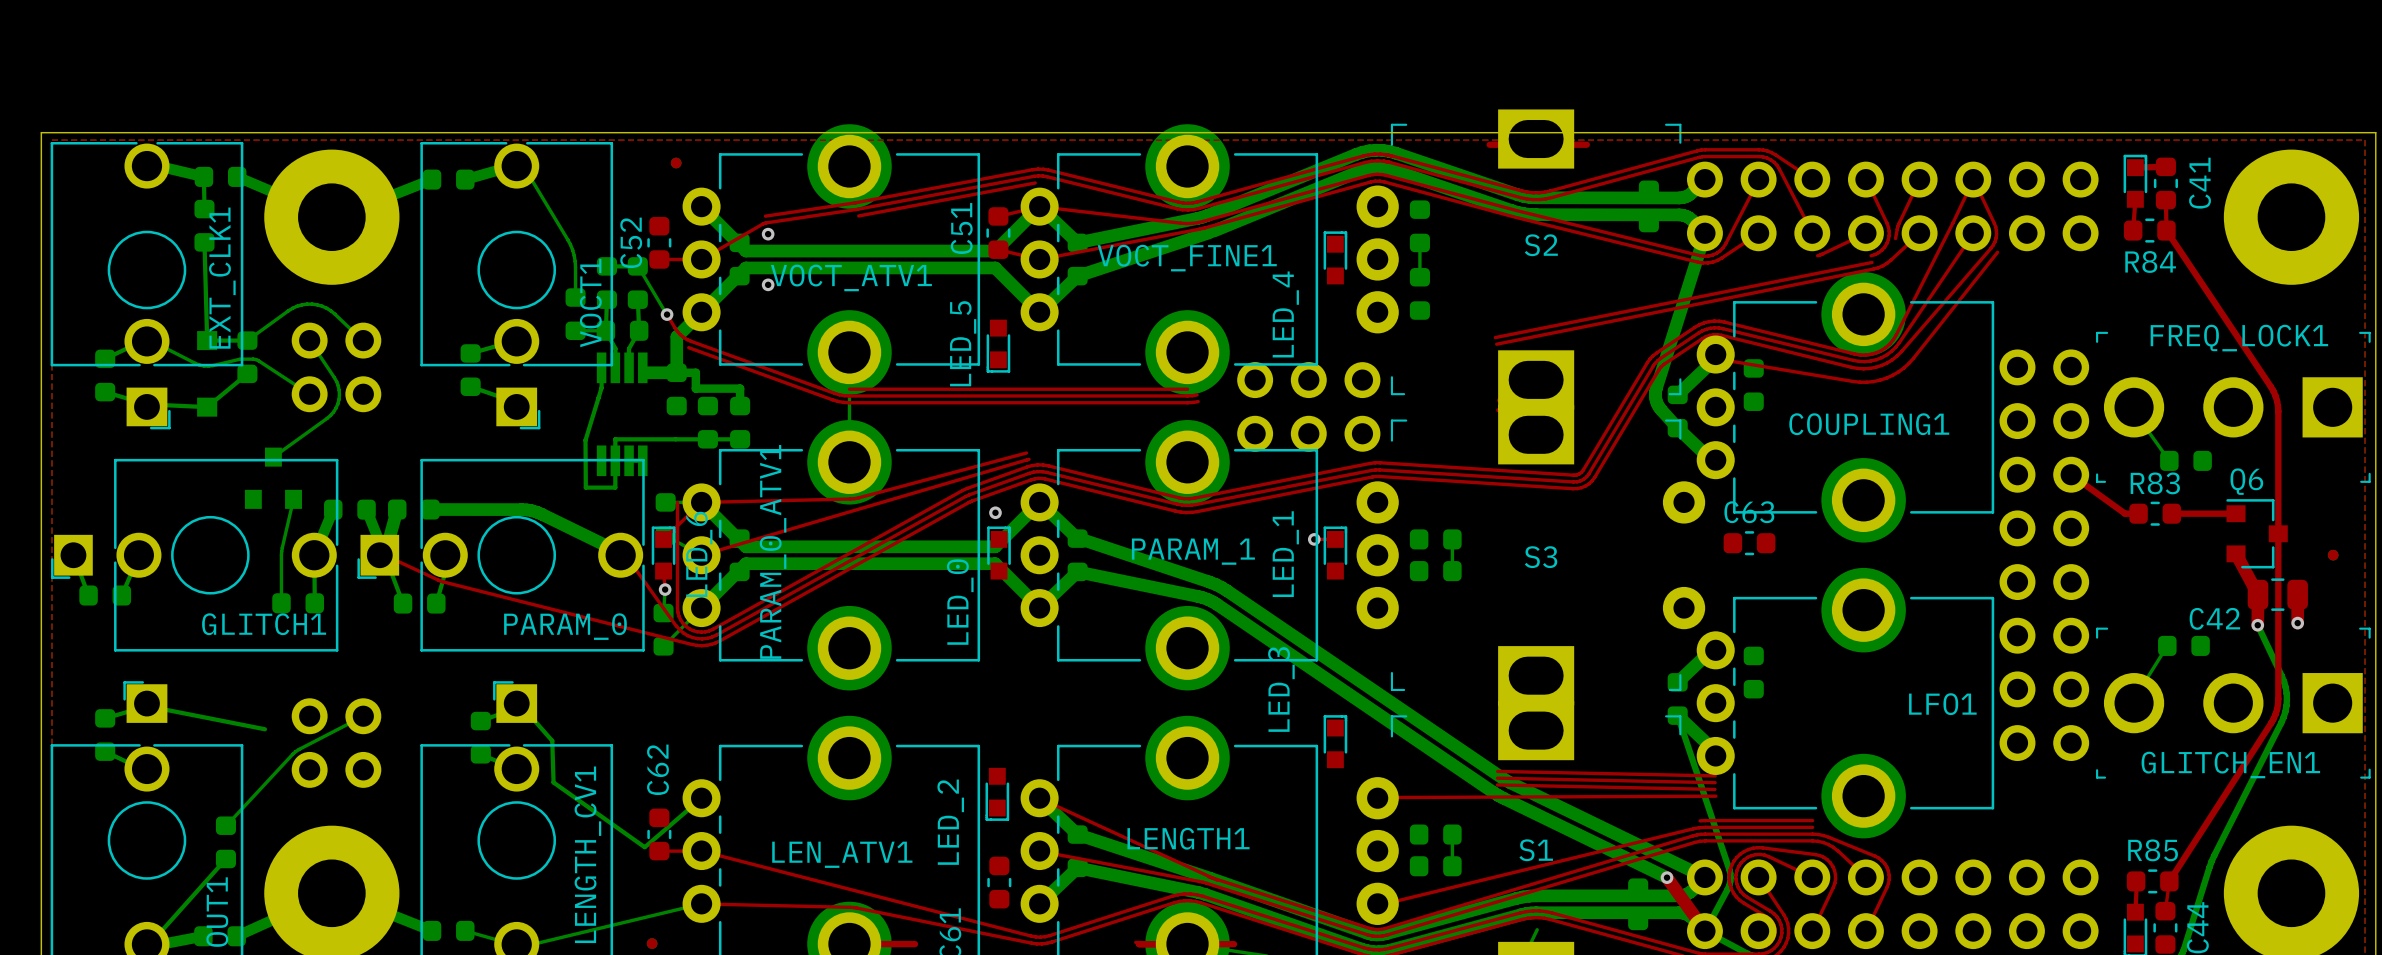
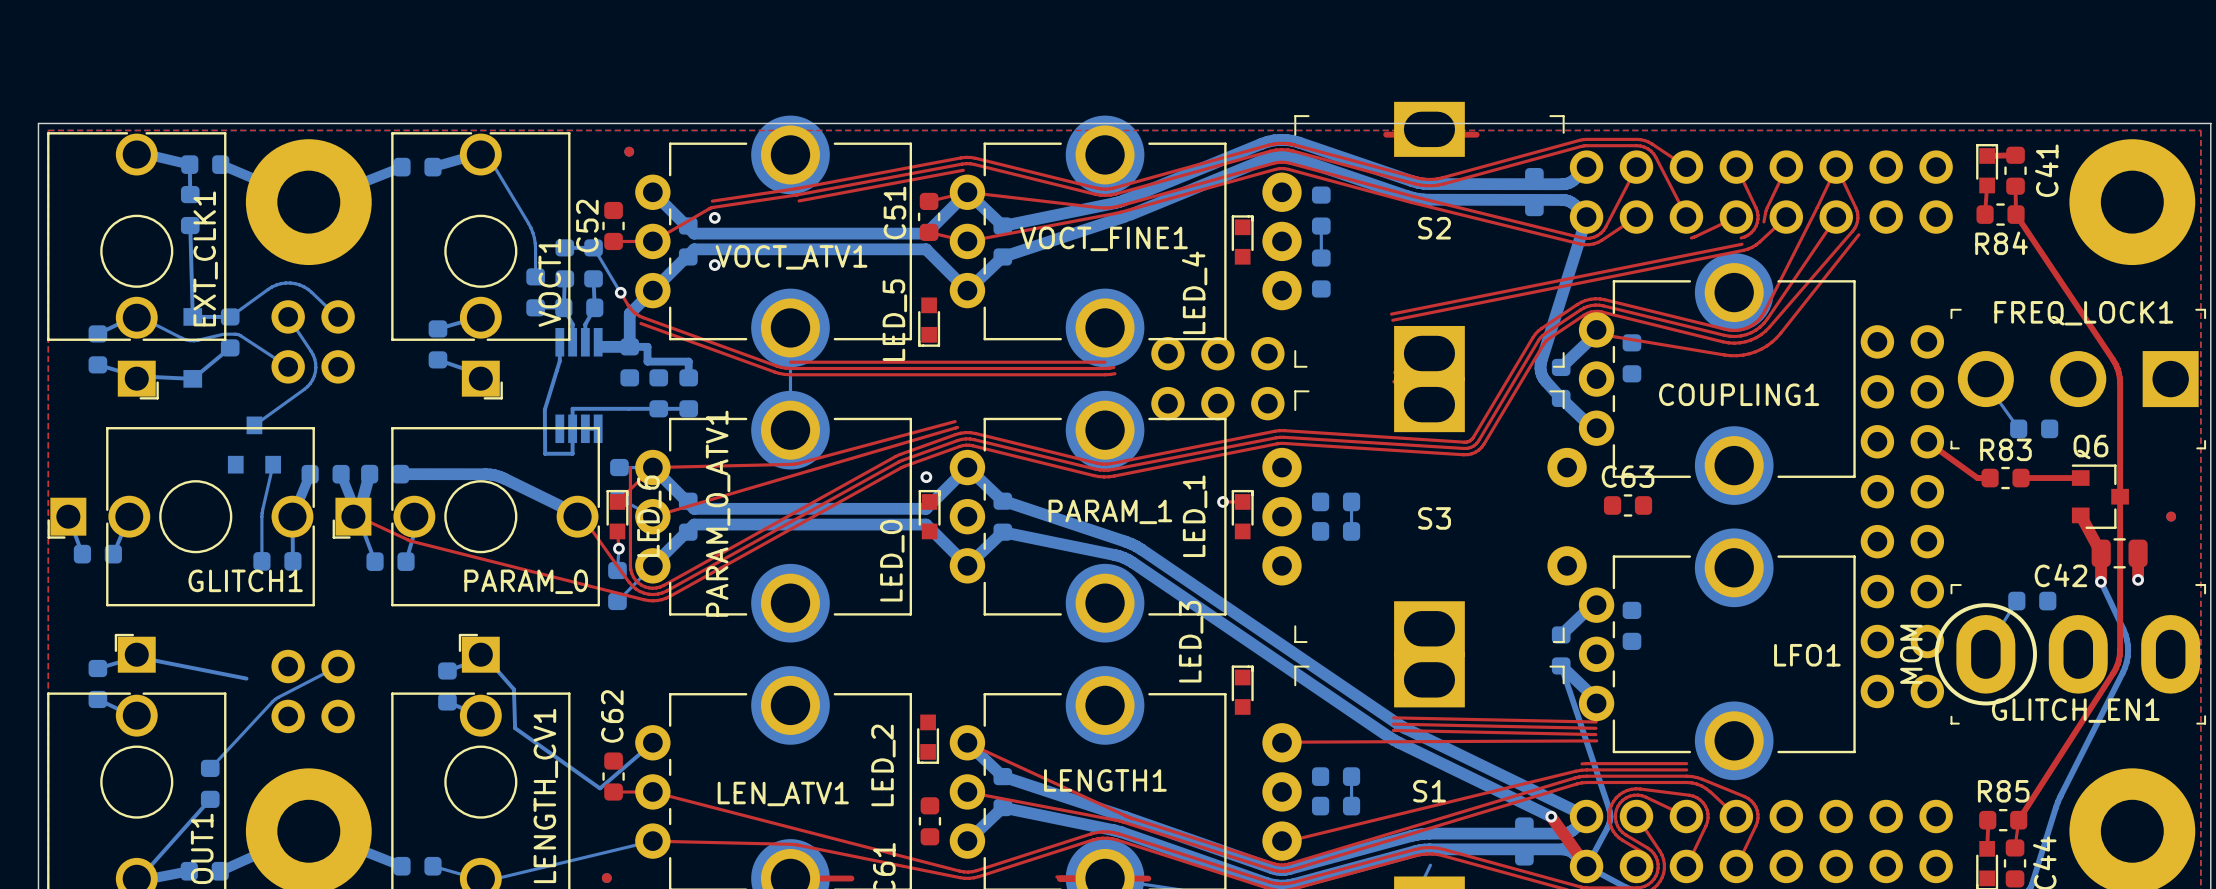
GLITCH_EN1 footprint: [2096, 627, 2371, 779] -> [1934, 584, 2207, 725]

